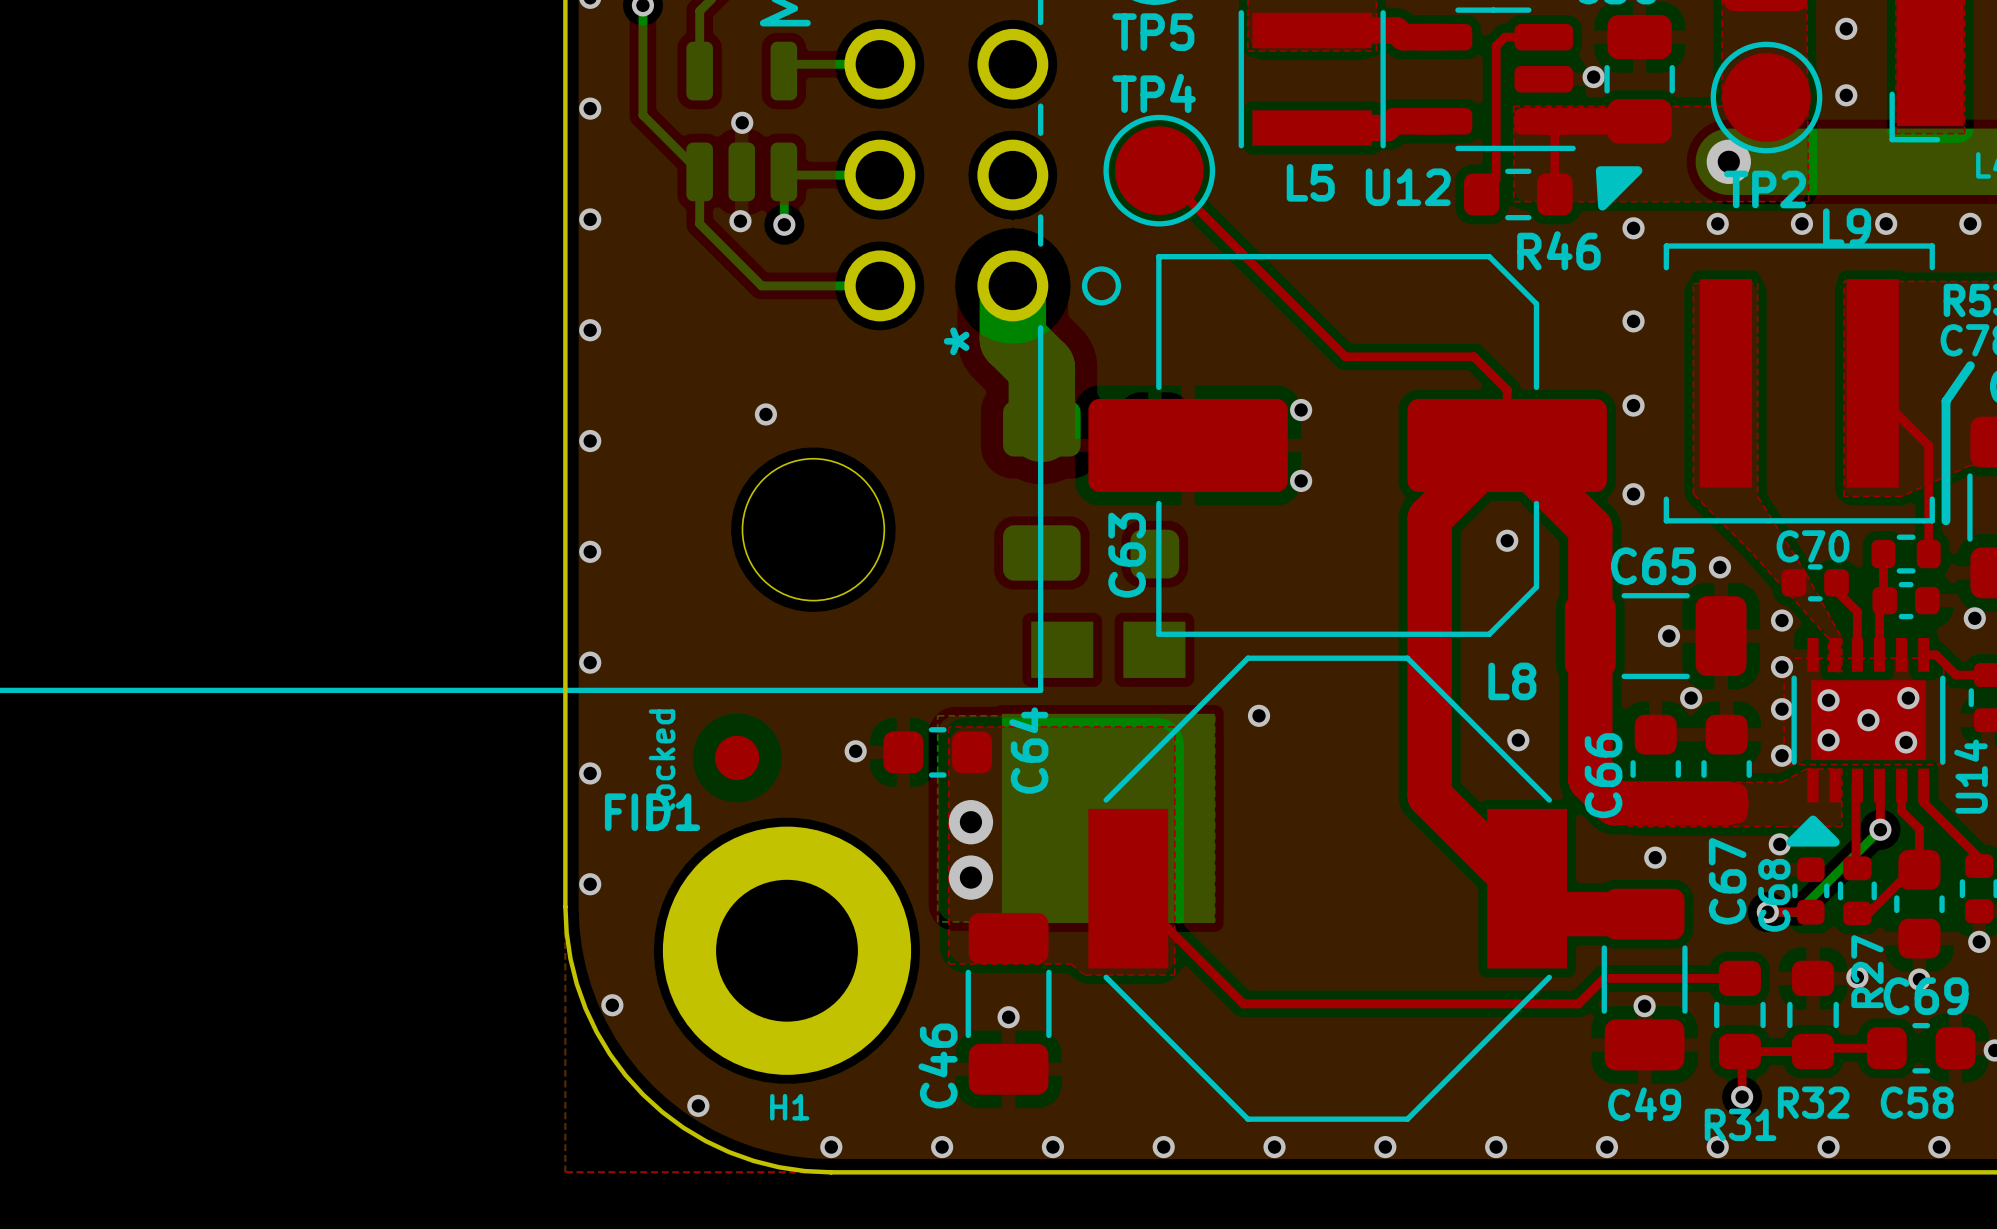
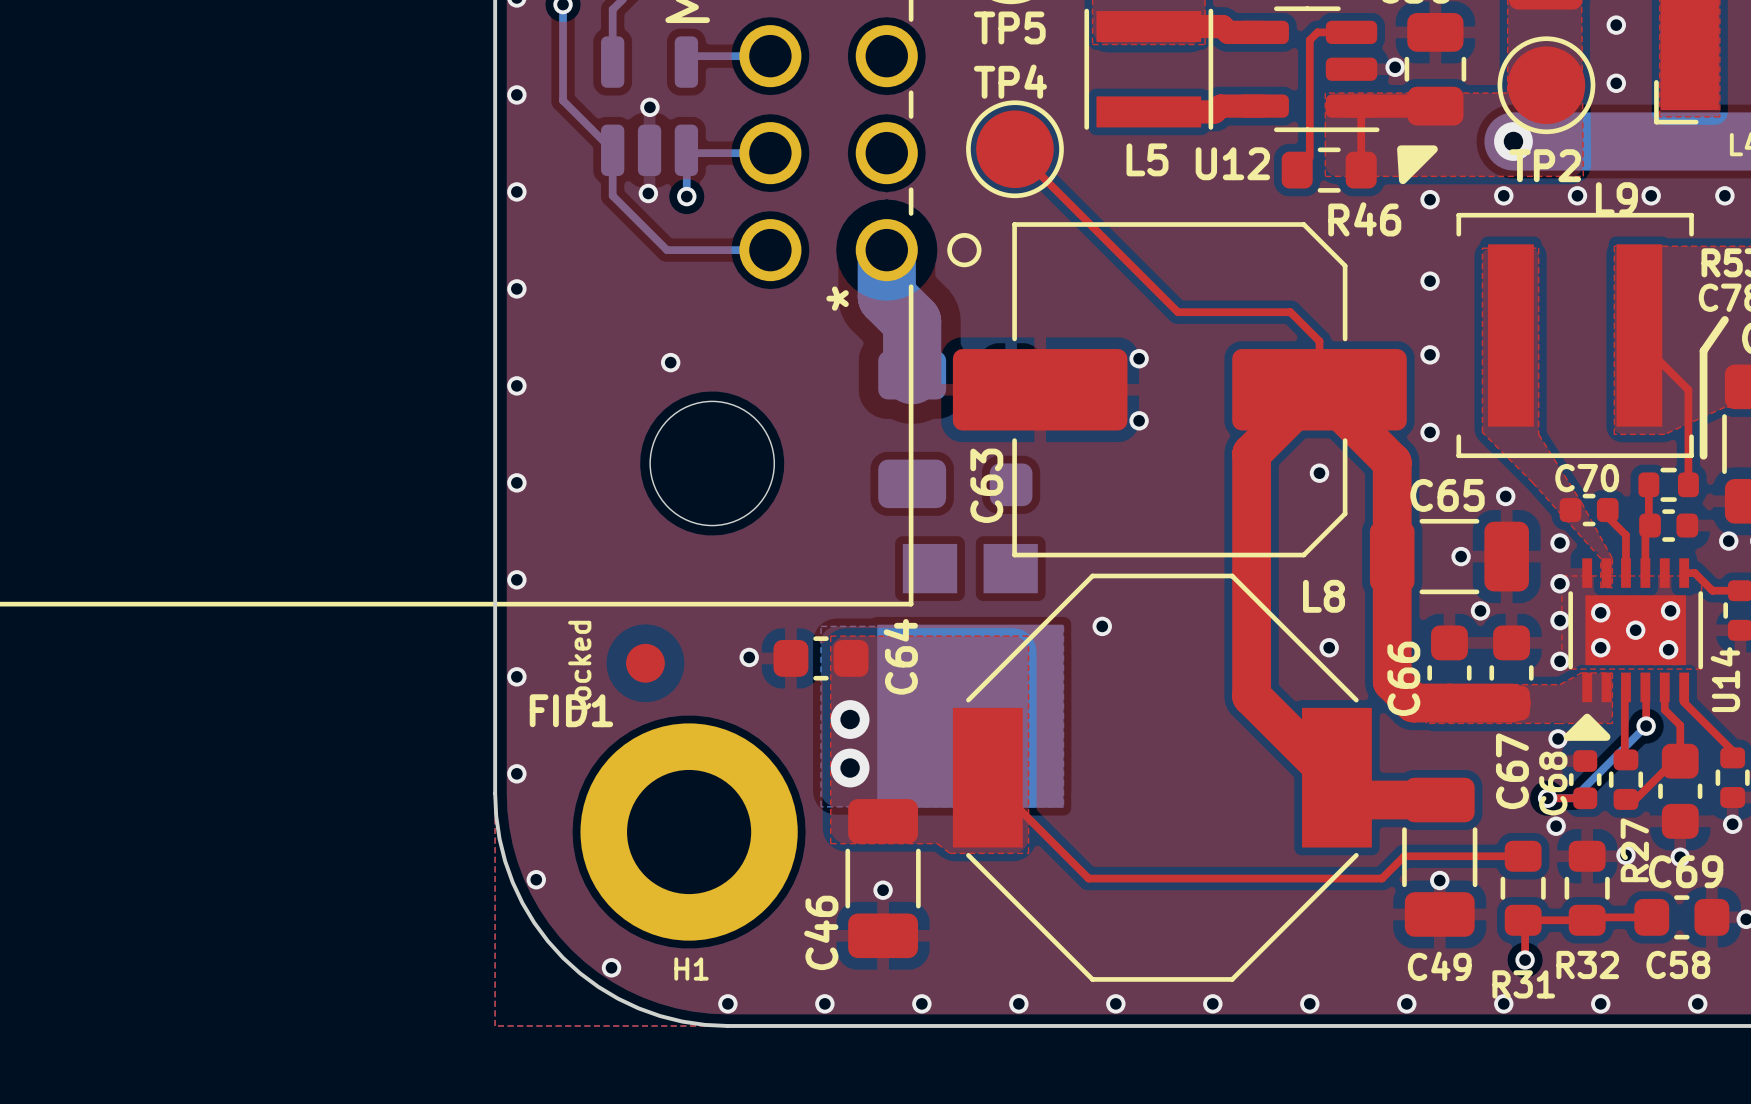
via position: (1655, 857) -> (1556, 826)

